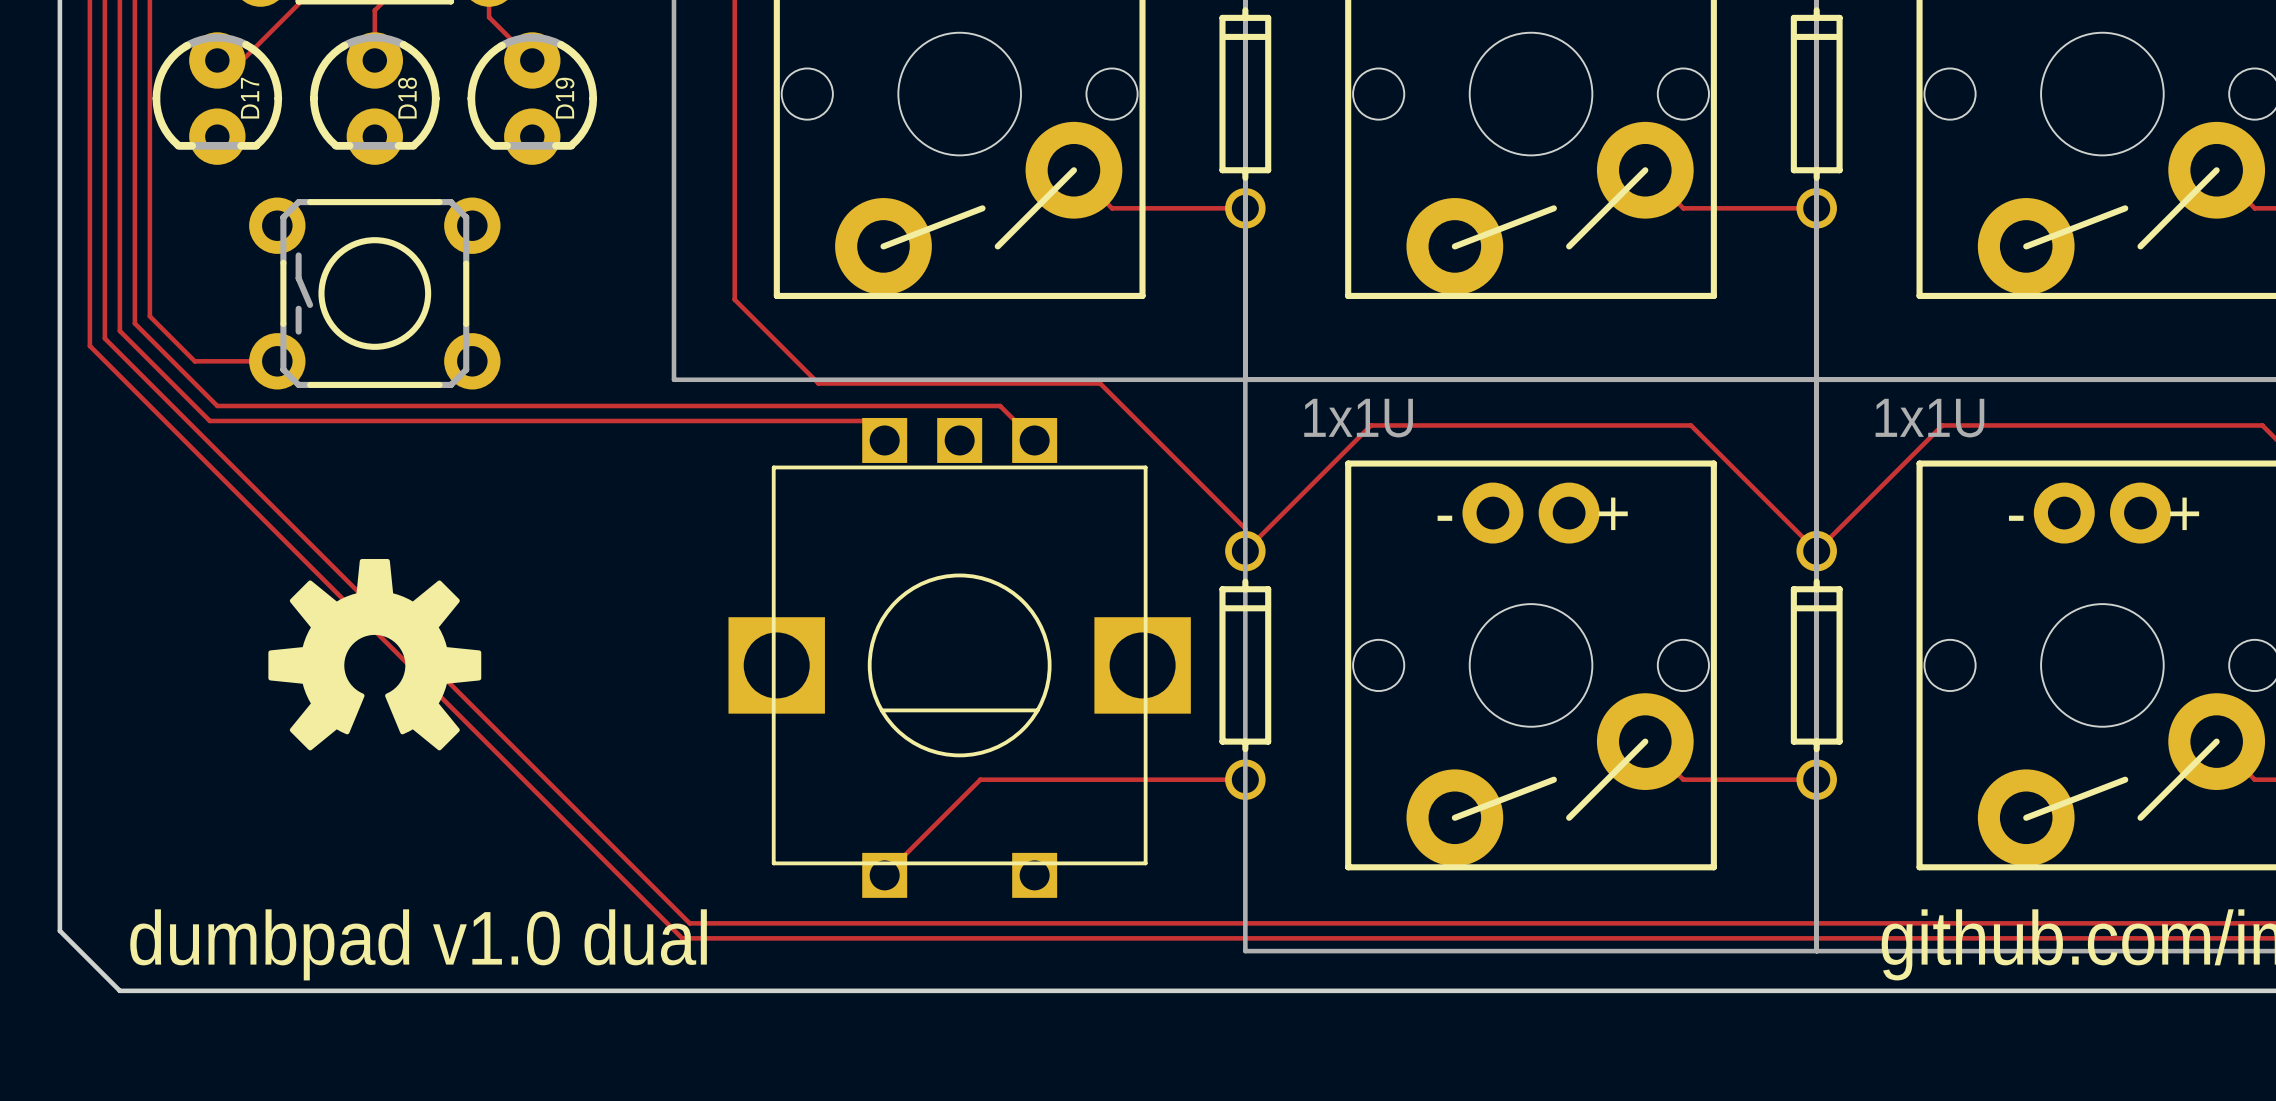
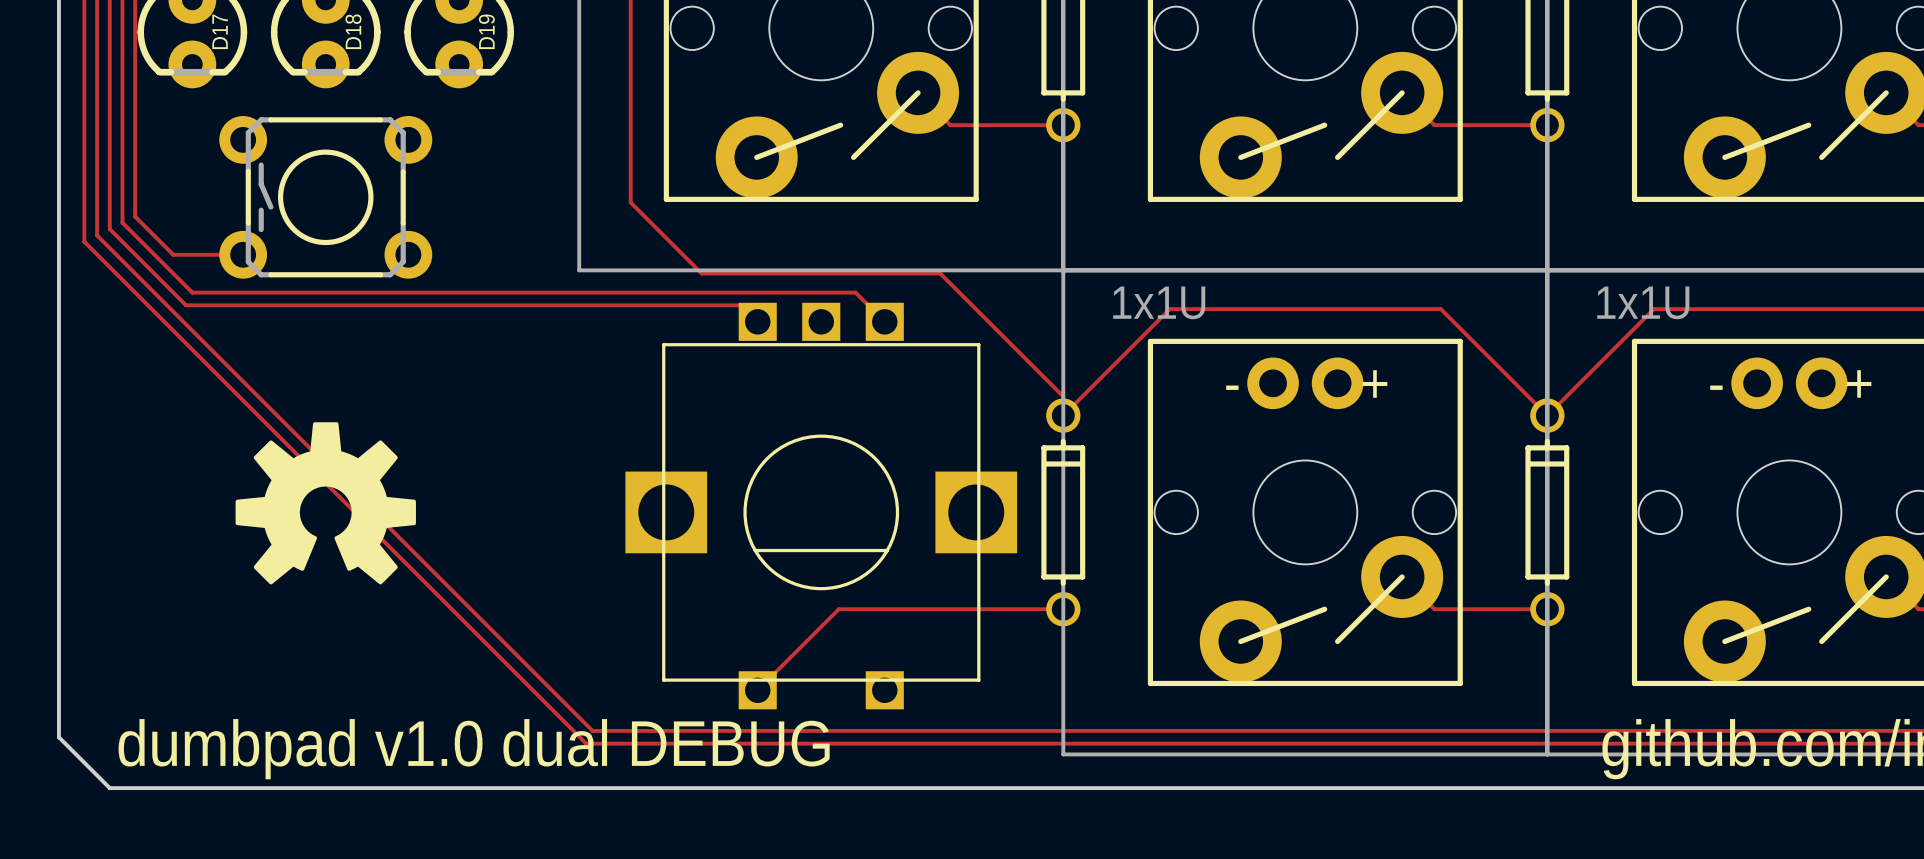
text: dumbpad v1.0 dual (418, 944) -> dumbpad v1.0 dual DEBUG (474, 749)

